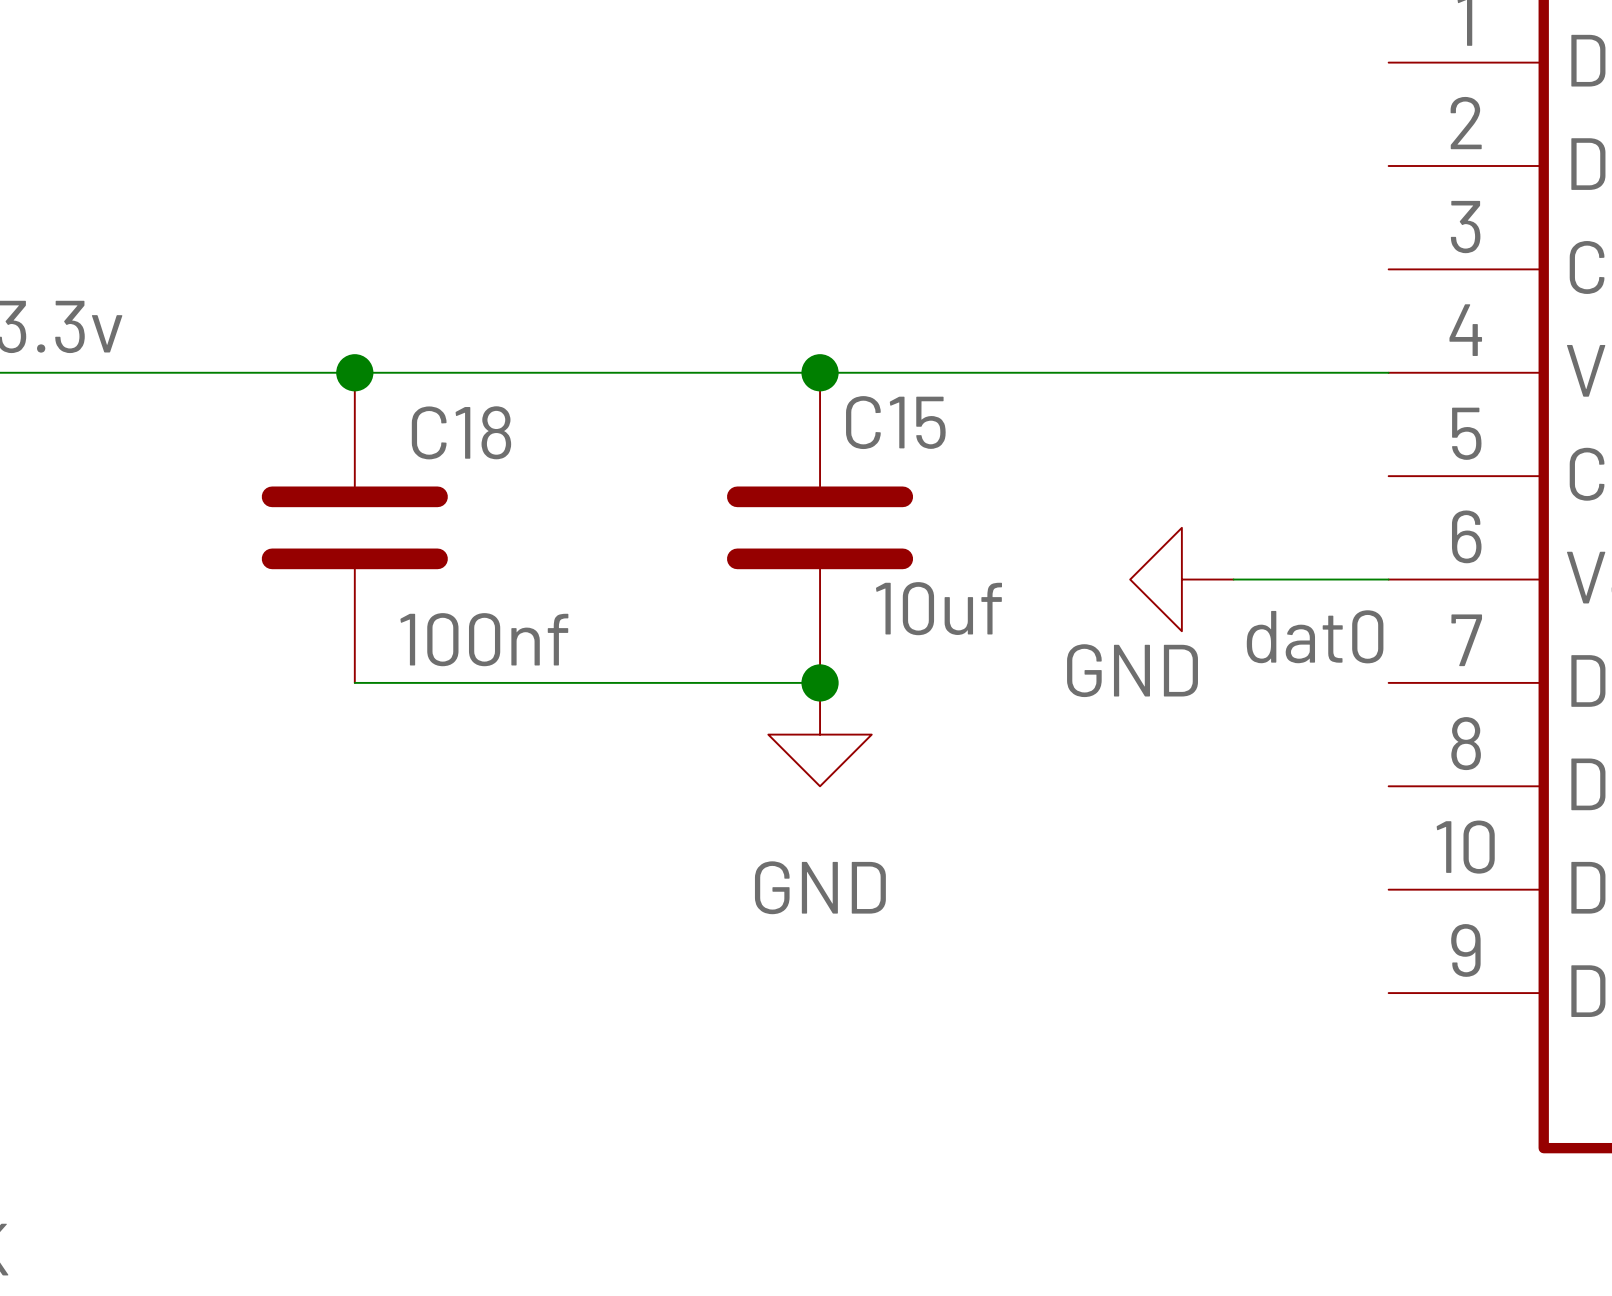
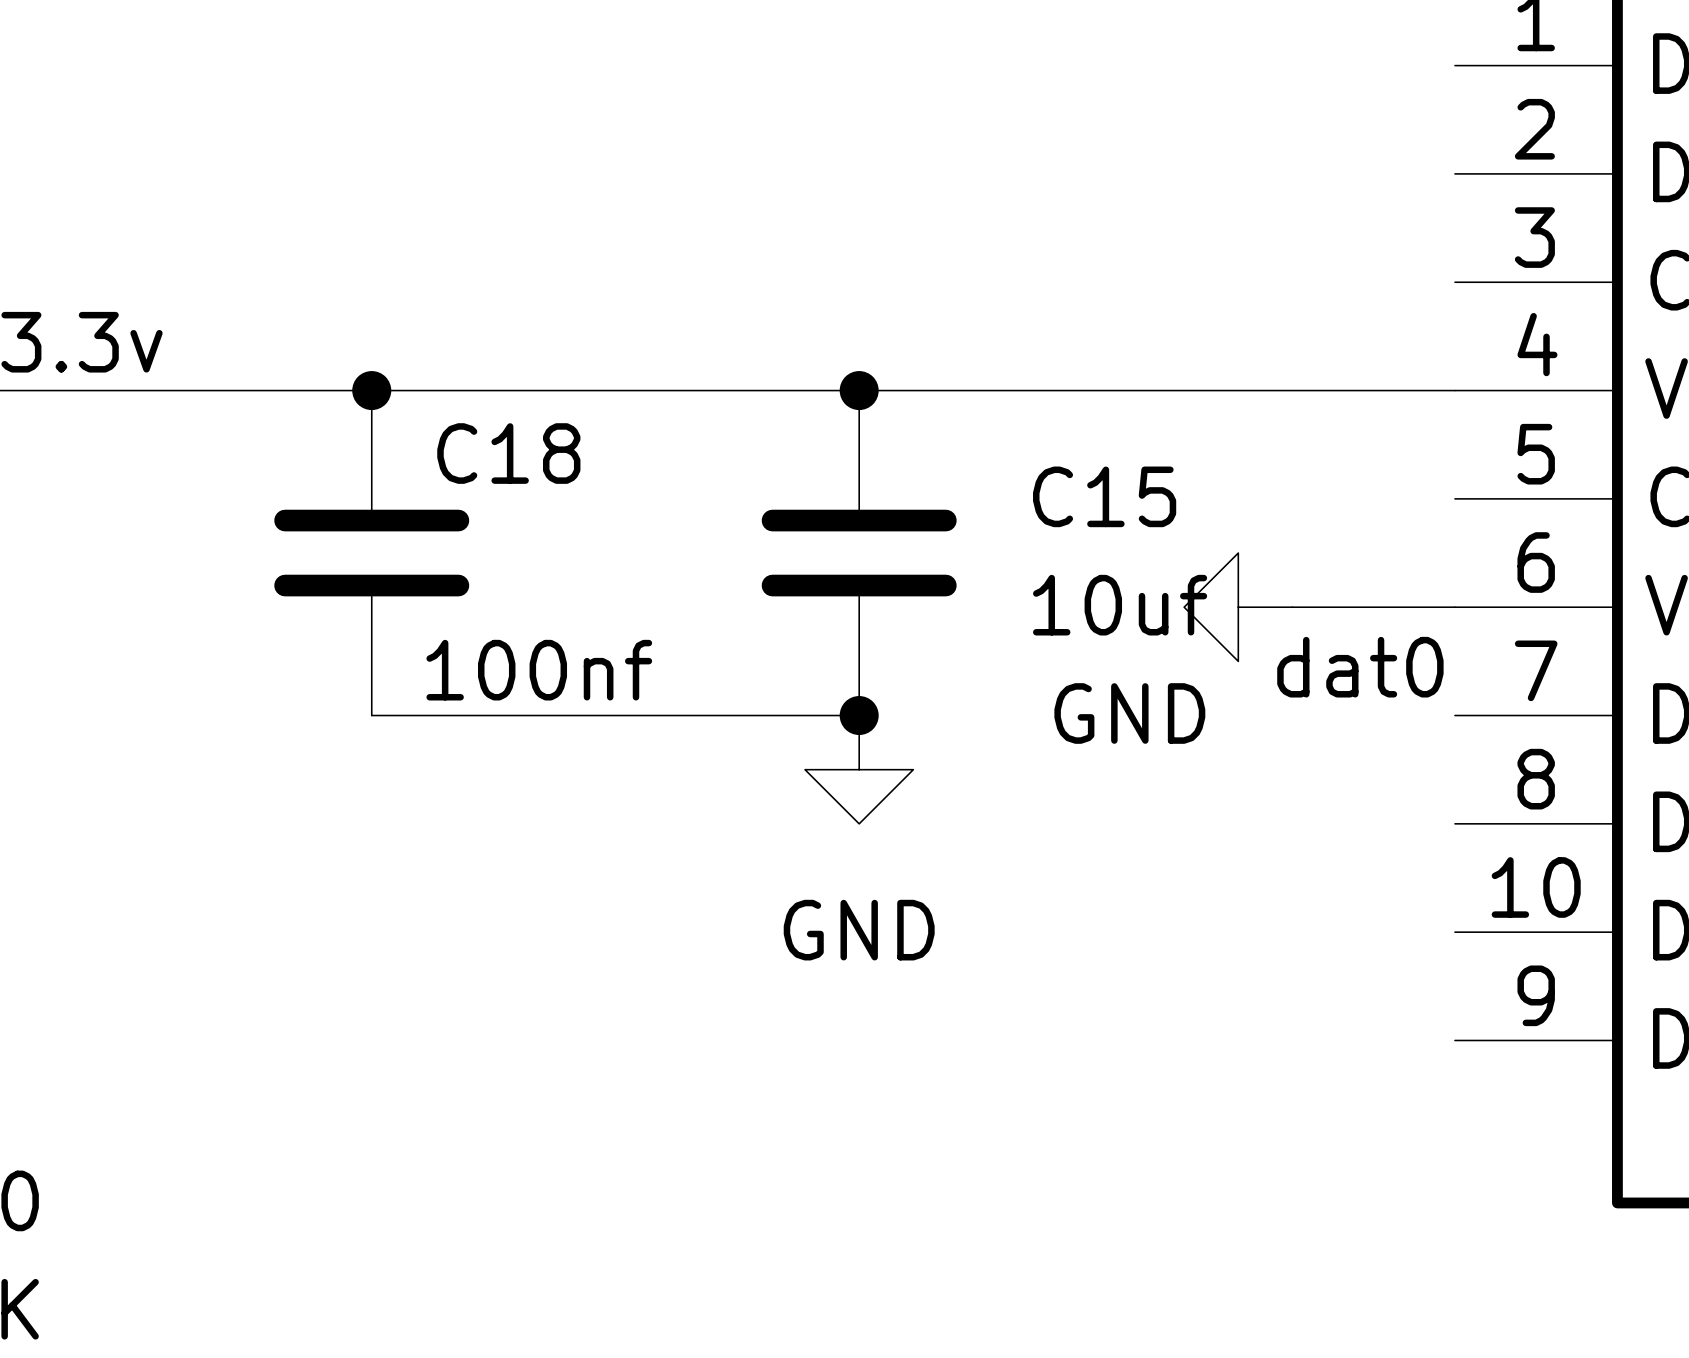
C15 name position: C15 (895, 422) -> C15 (1104, 496)
C15 value position: 10uf (939, 608) -> 10uf (1120, 605)
power symbol text position: GND (1132, 670) -> GND (1129, 713)

